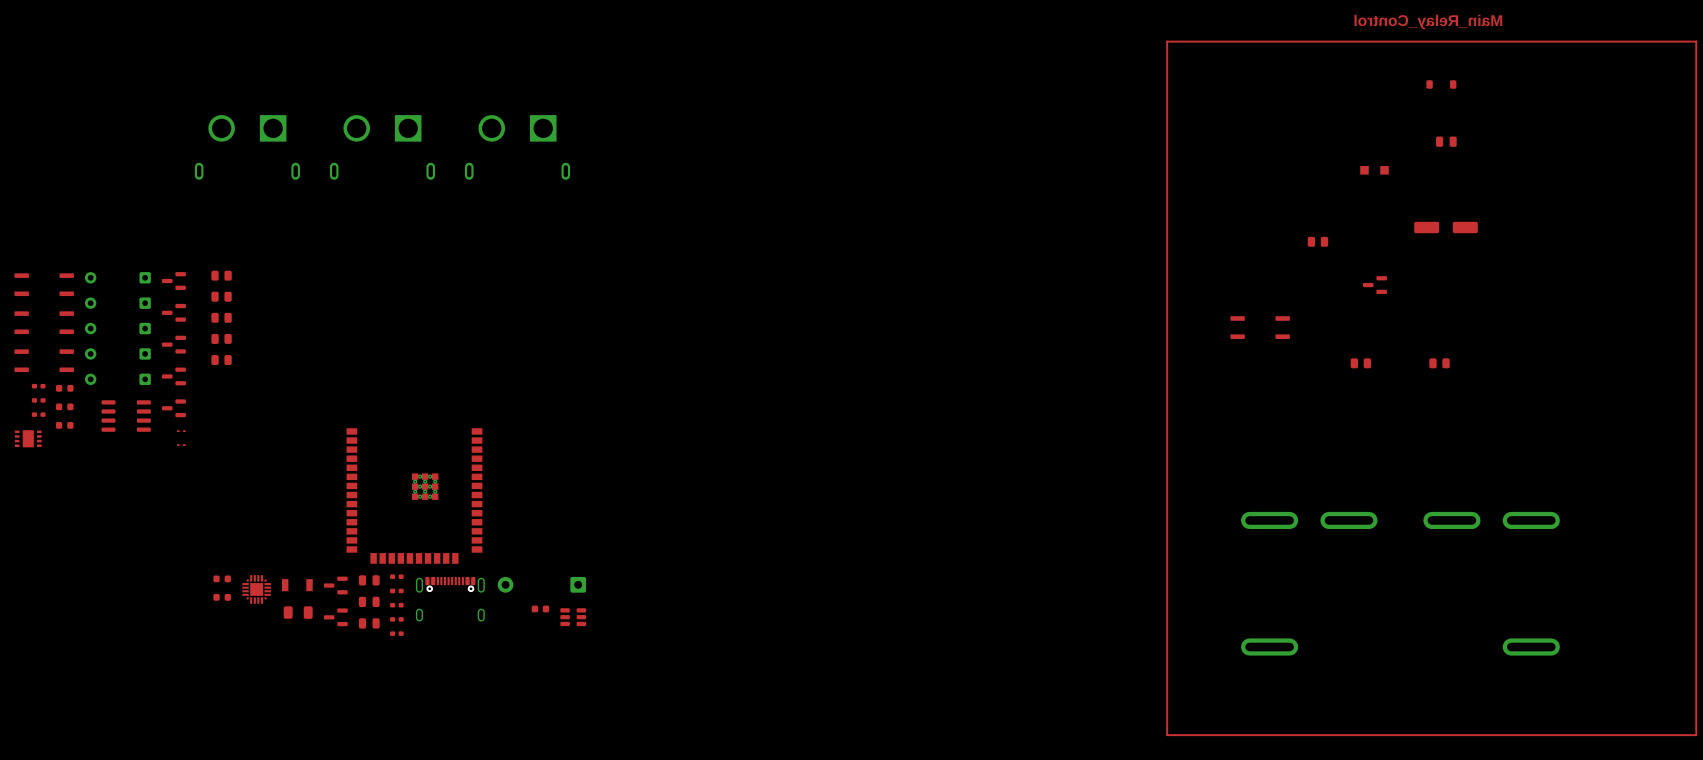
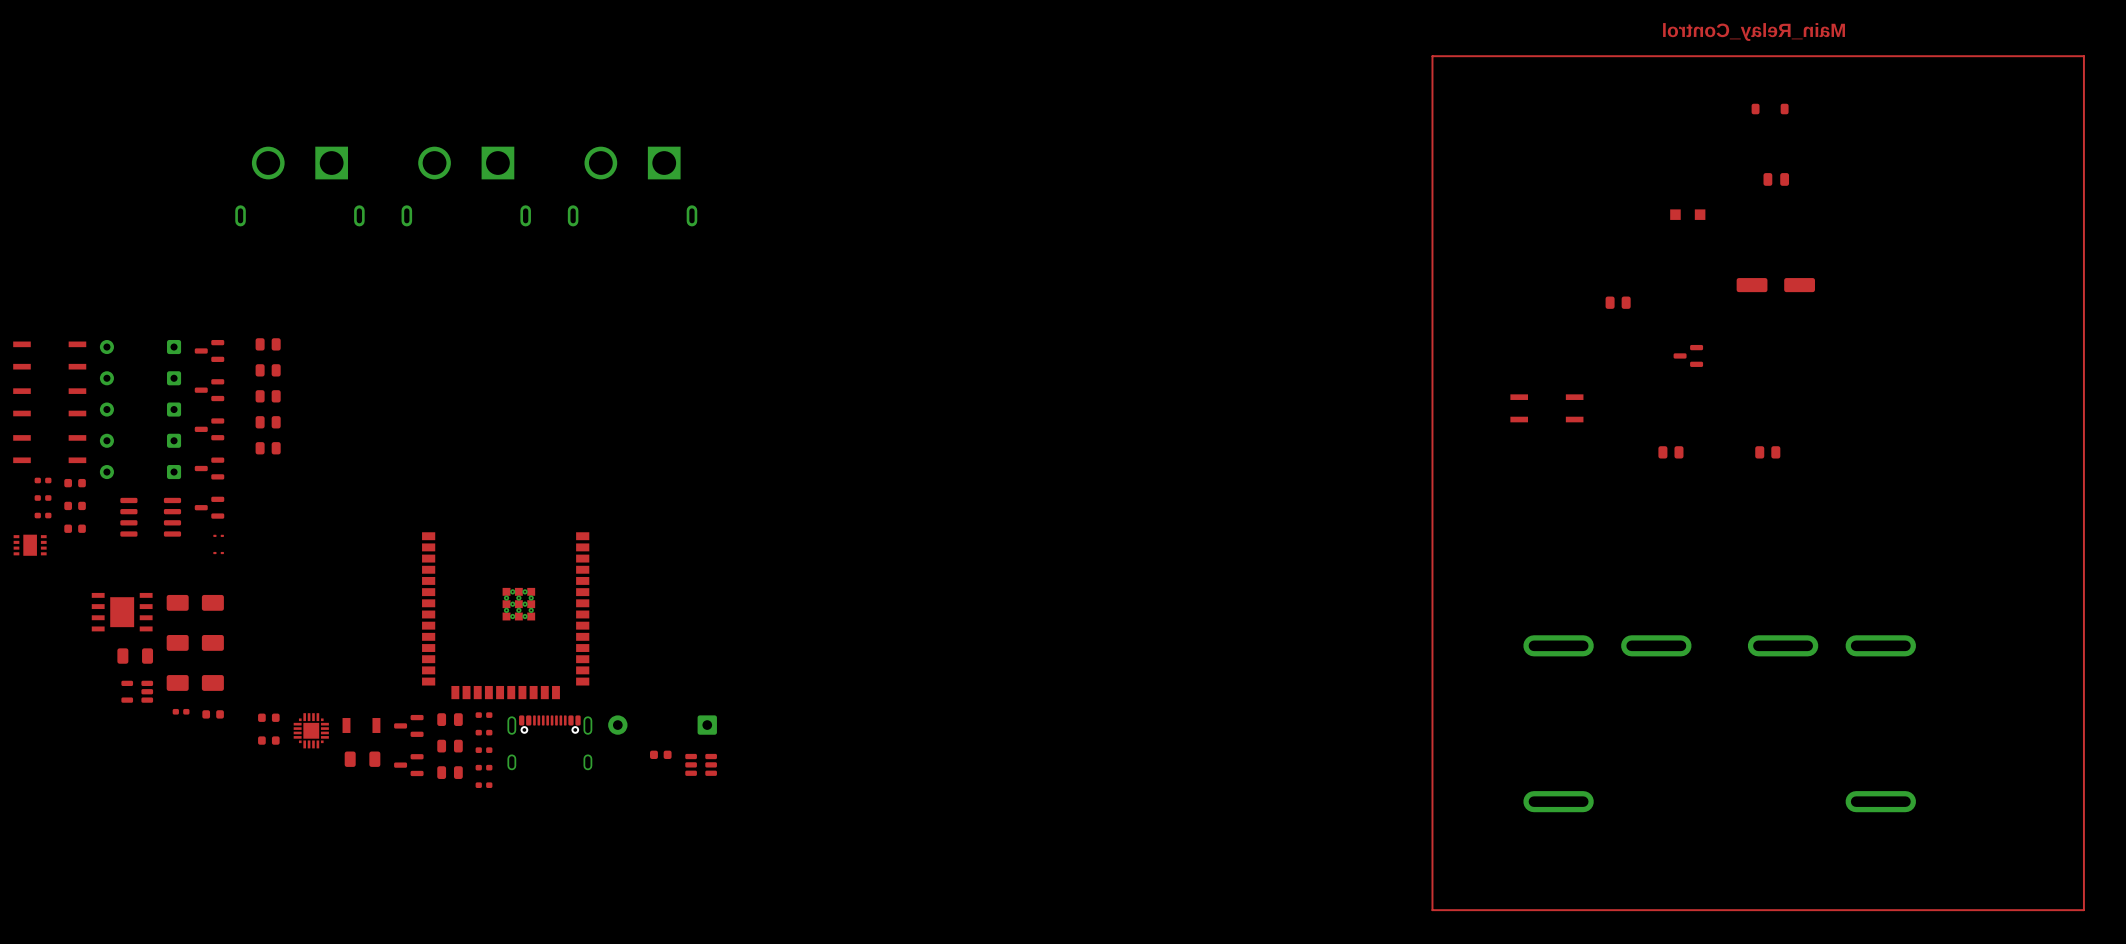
part: none -> (195, 602)
part: none -> (122, 612)
part: none -> (195, 642)
part: none -> (135, 656)
part: none -> (195, 682)
part: none -> (137, 691)
part: none -> (181, 711)
part: none -> (213, 714)

